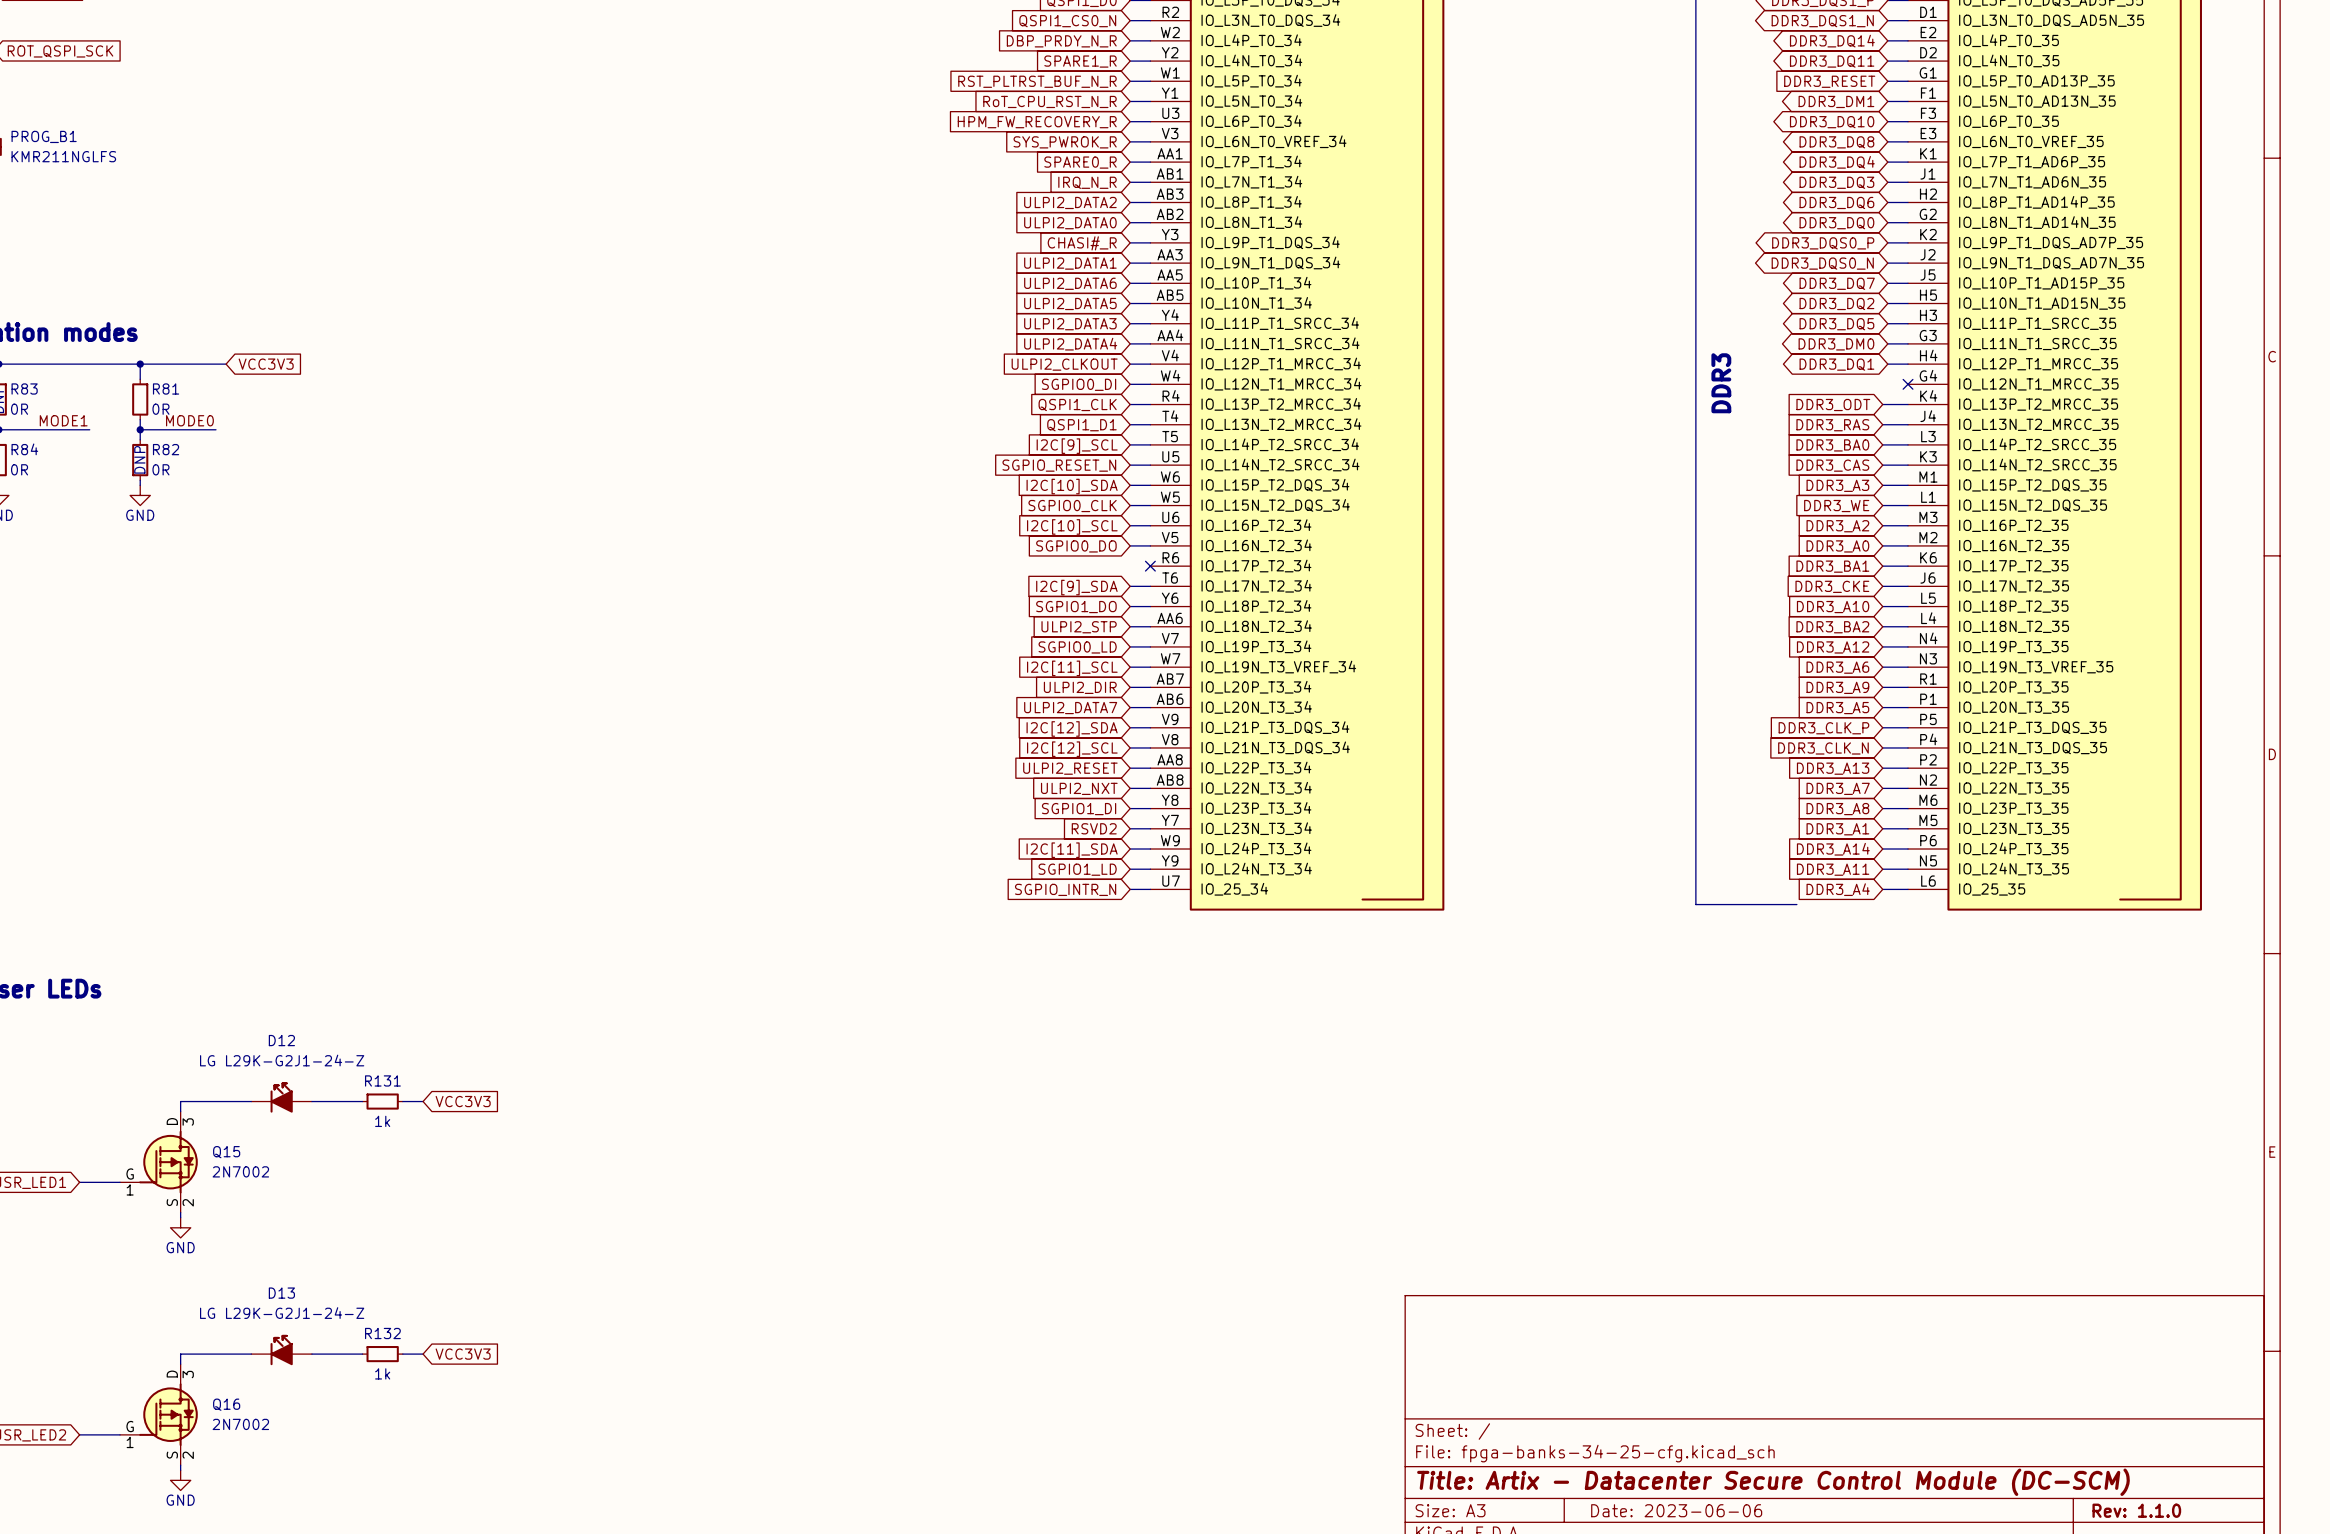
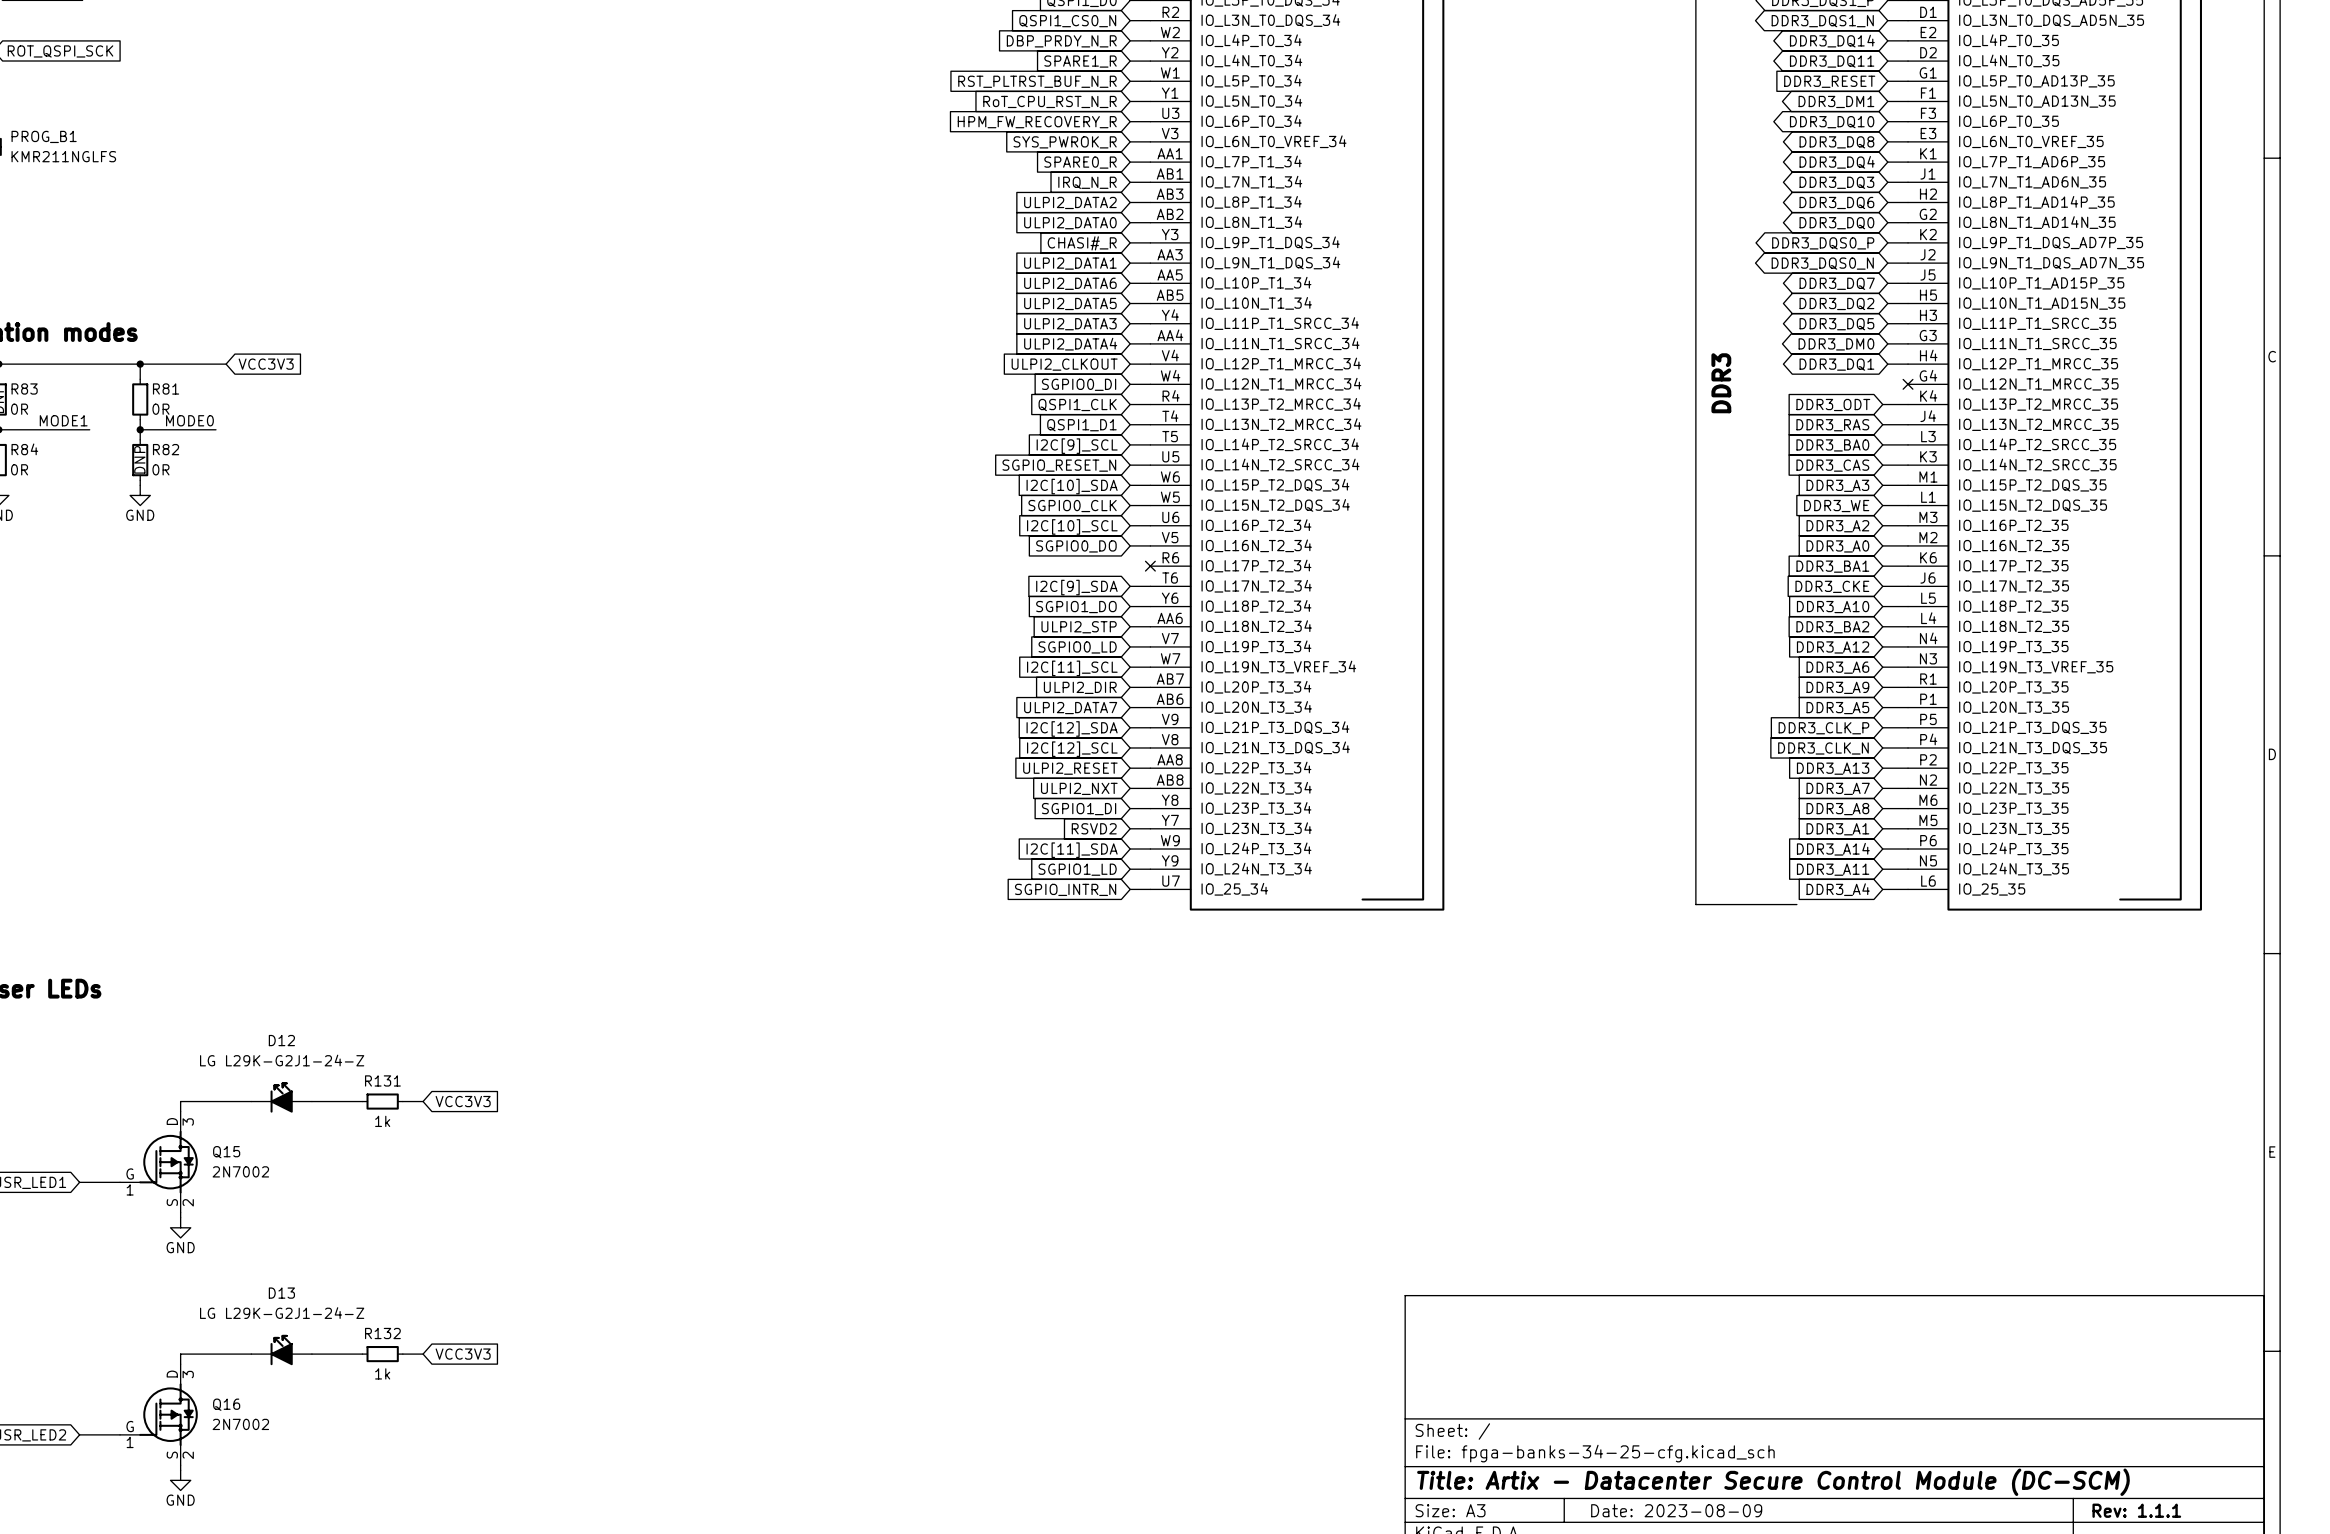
title block: Date: 2023-06-06 (1676, 1510) -> Date: 2023-08-09 (1676, 1510)
title block: Rev: 1.1.0 (2136, 1510) -> Rev: 1.1.1 (2136, 1510)

